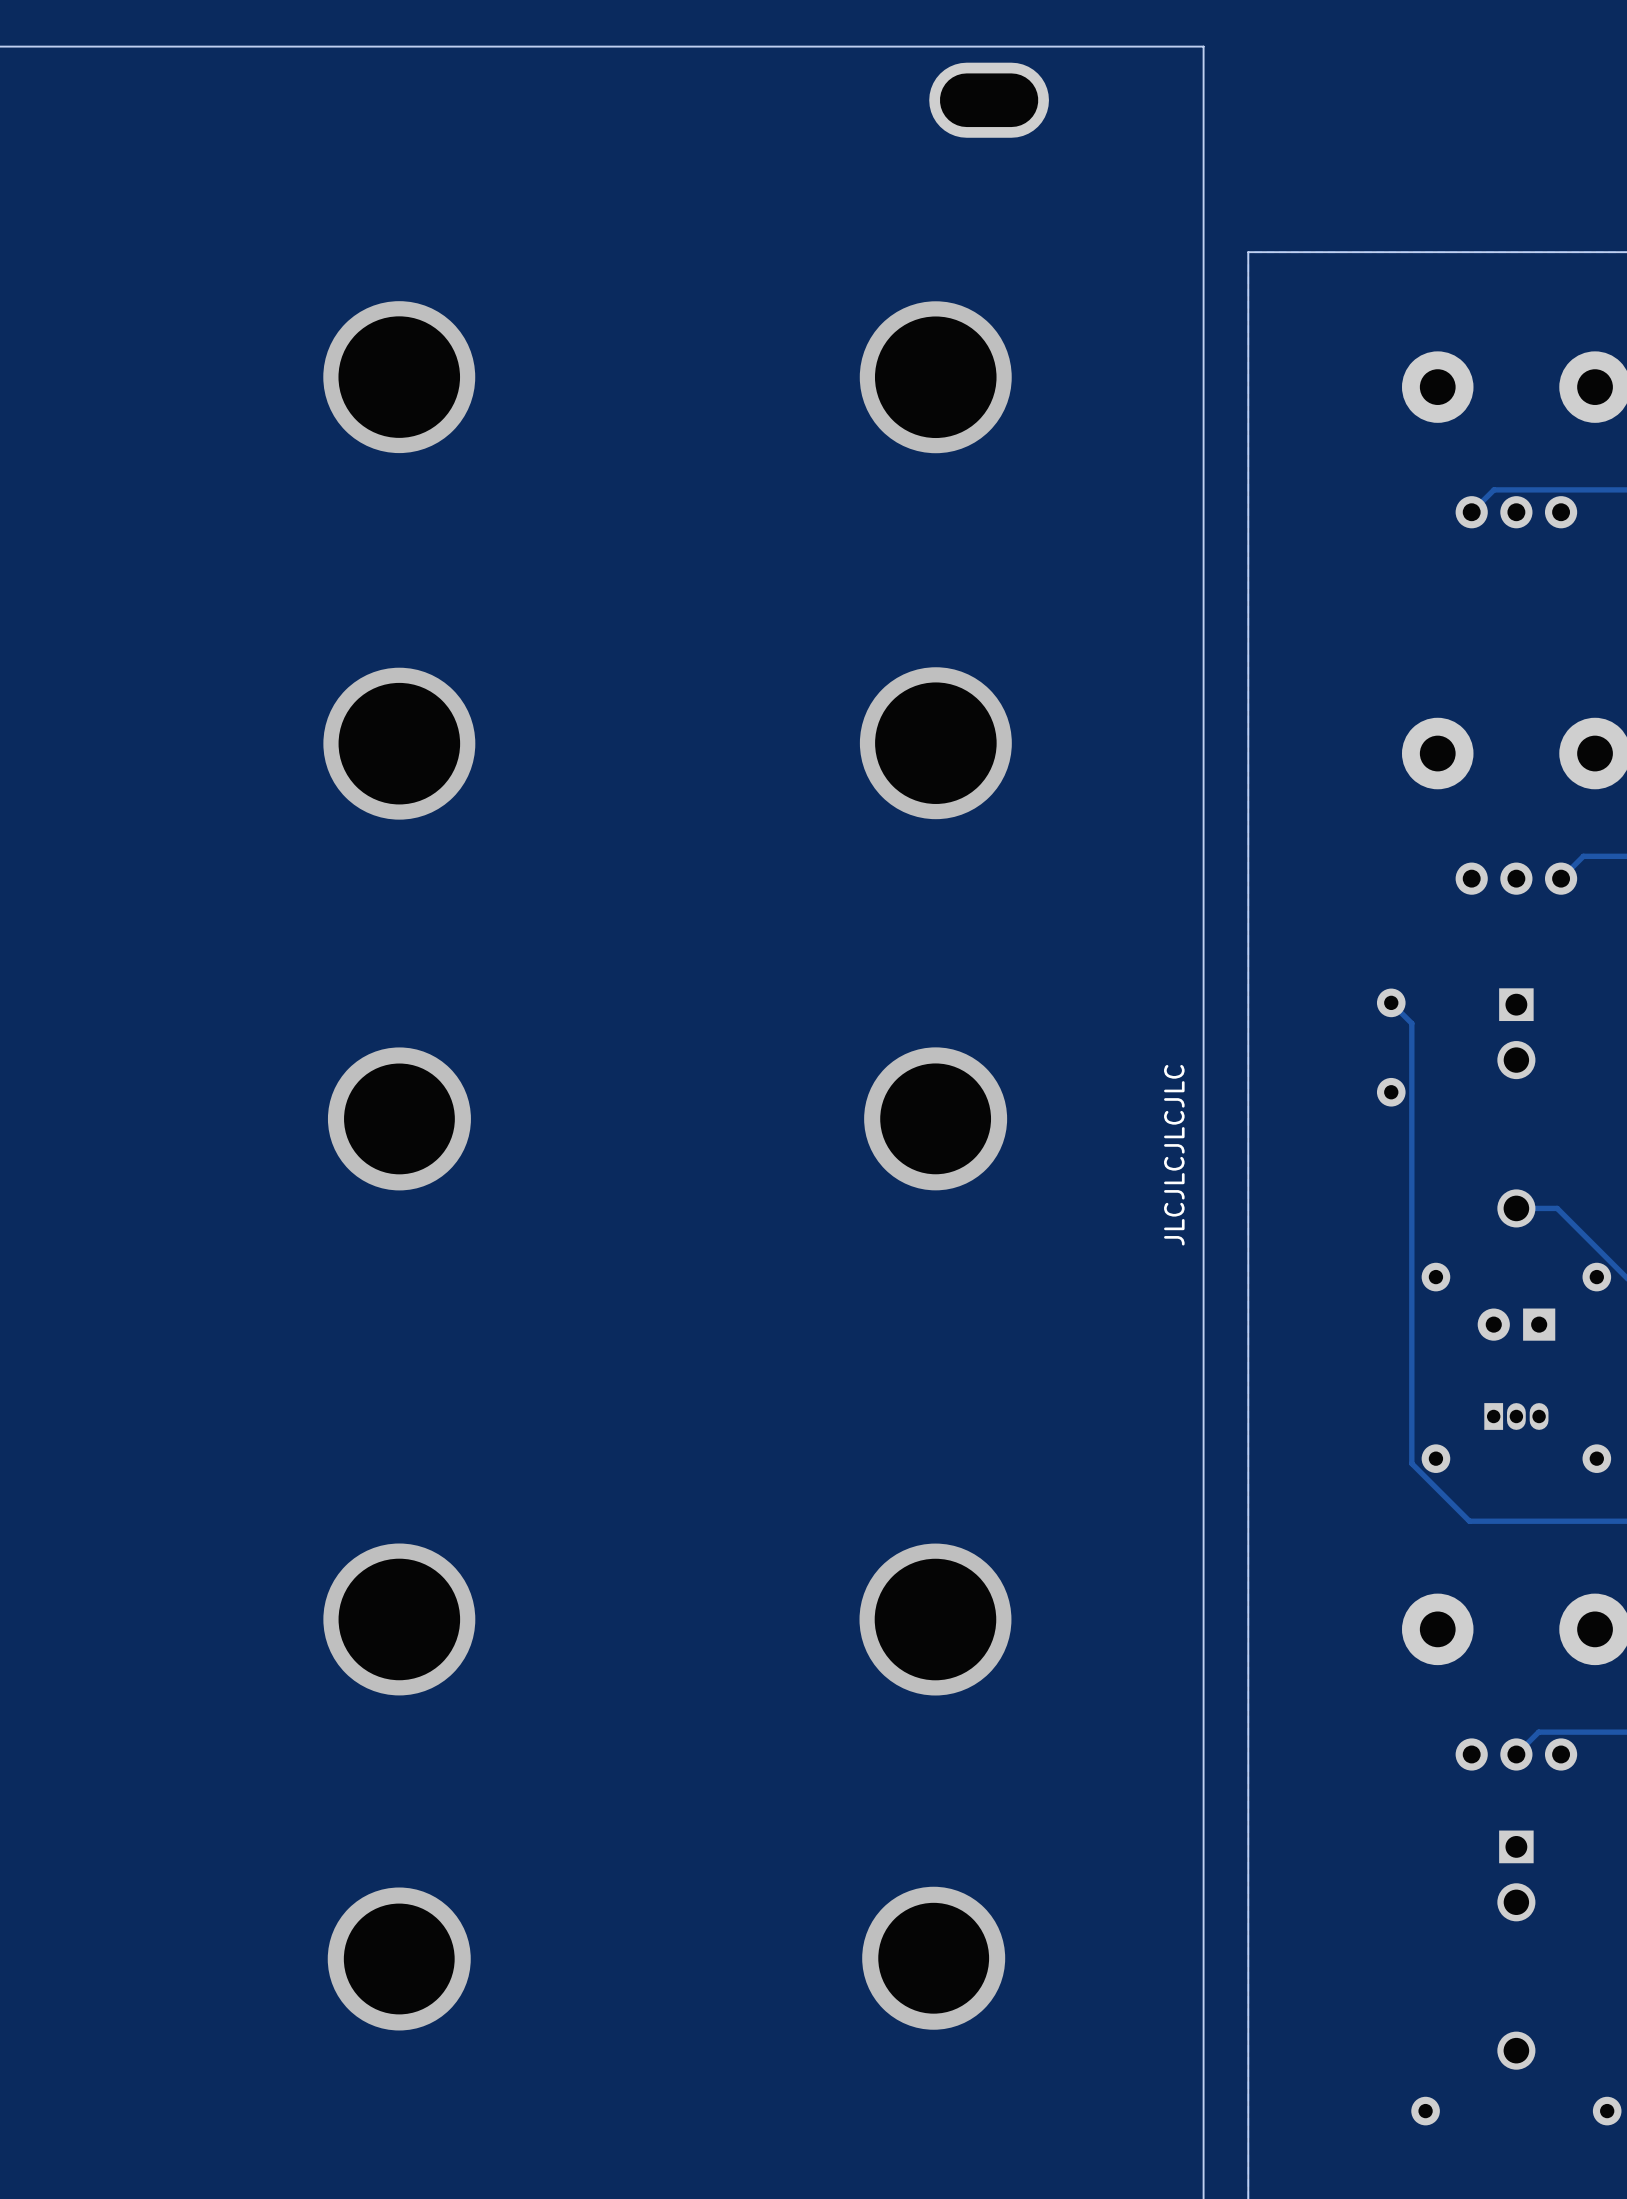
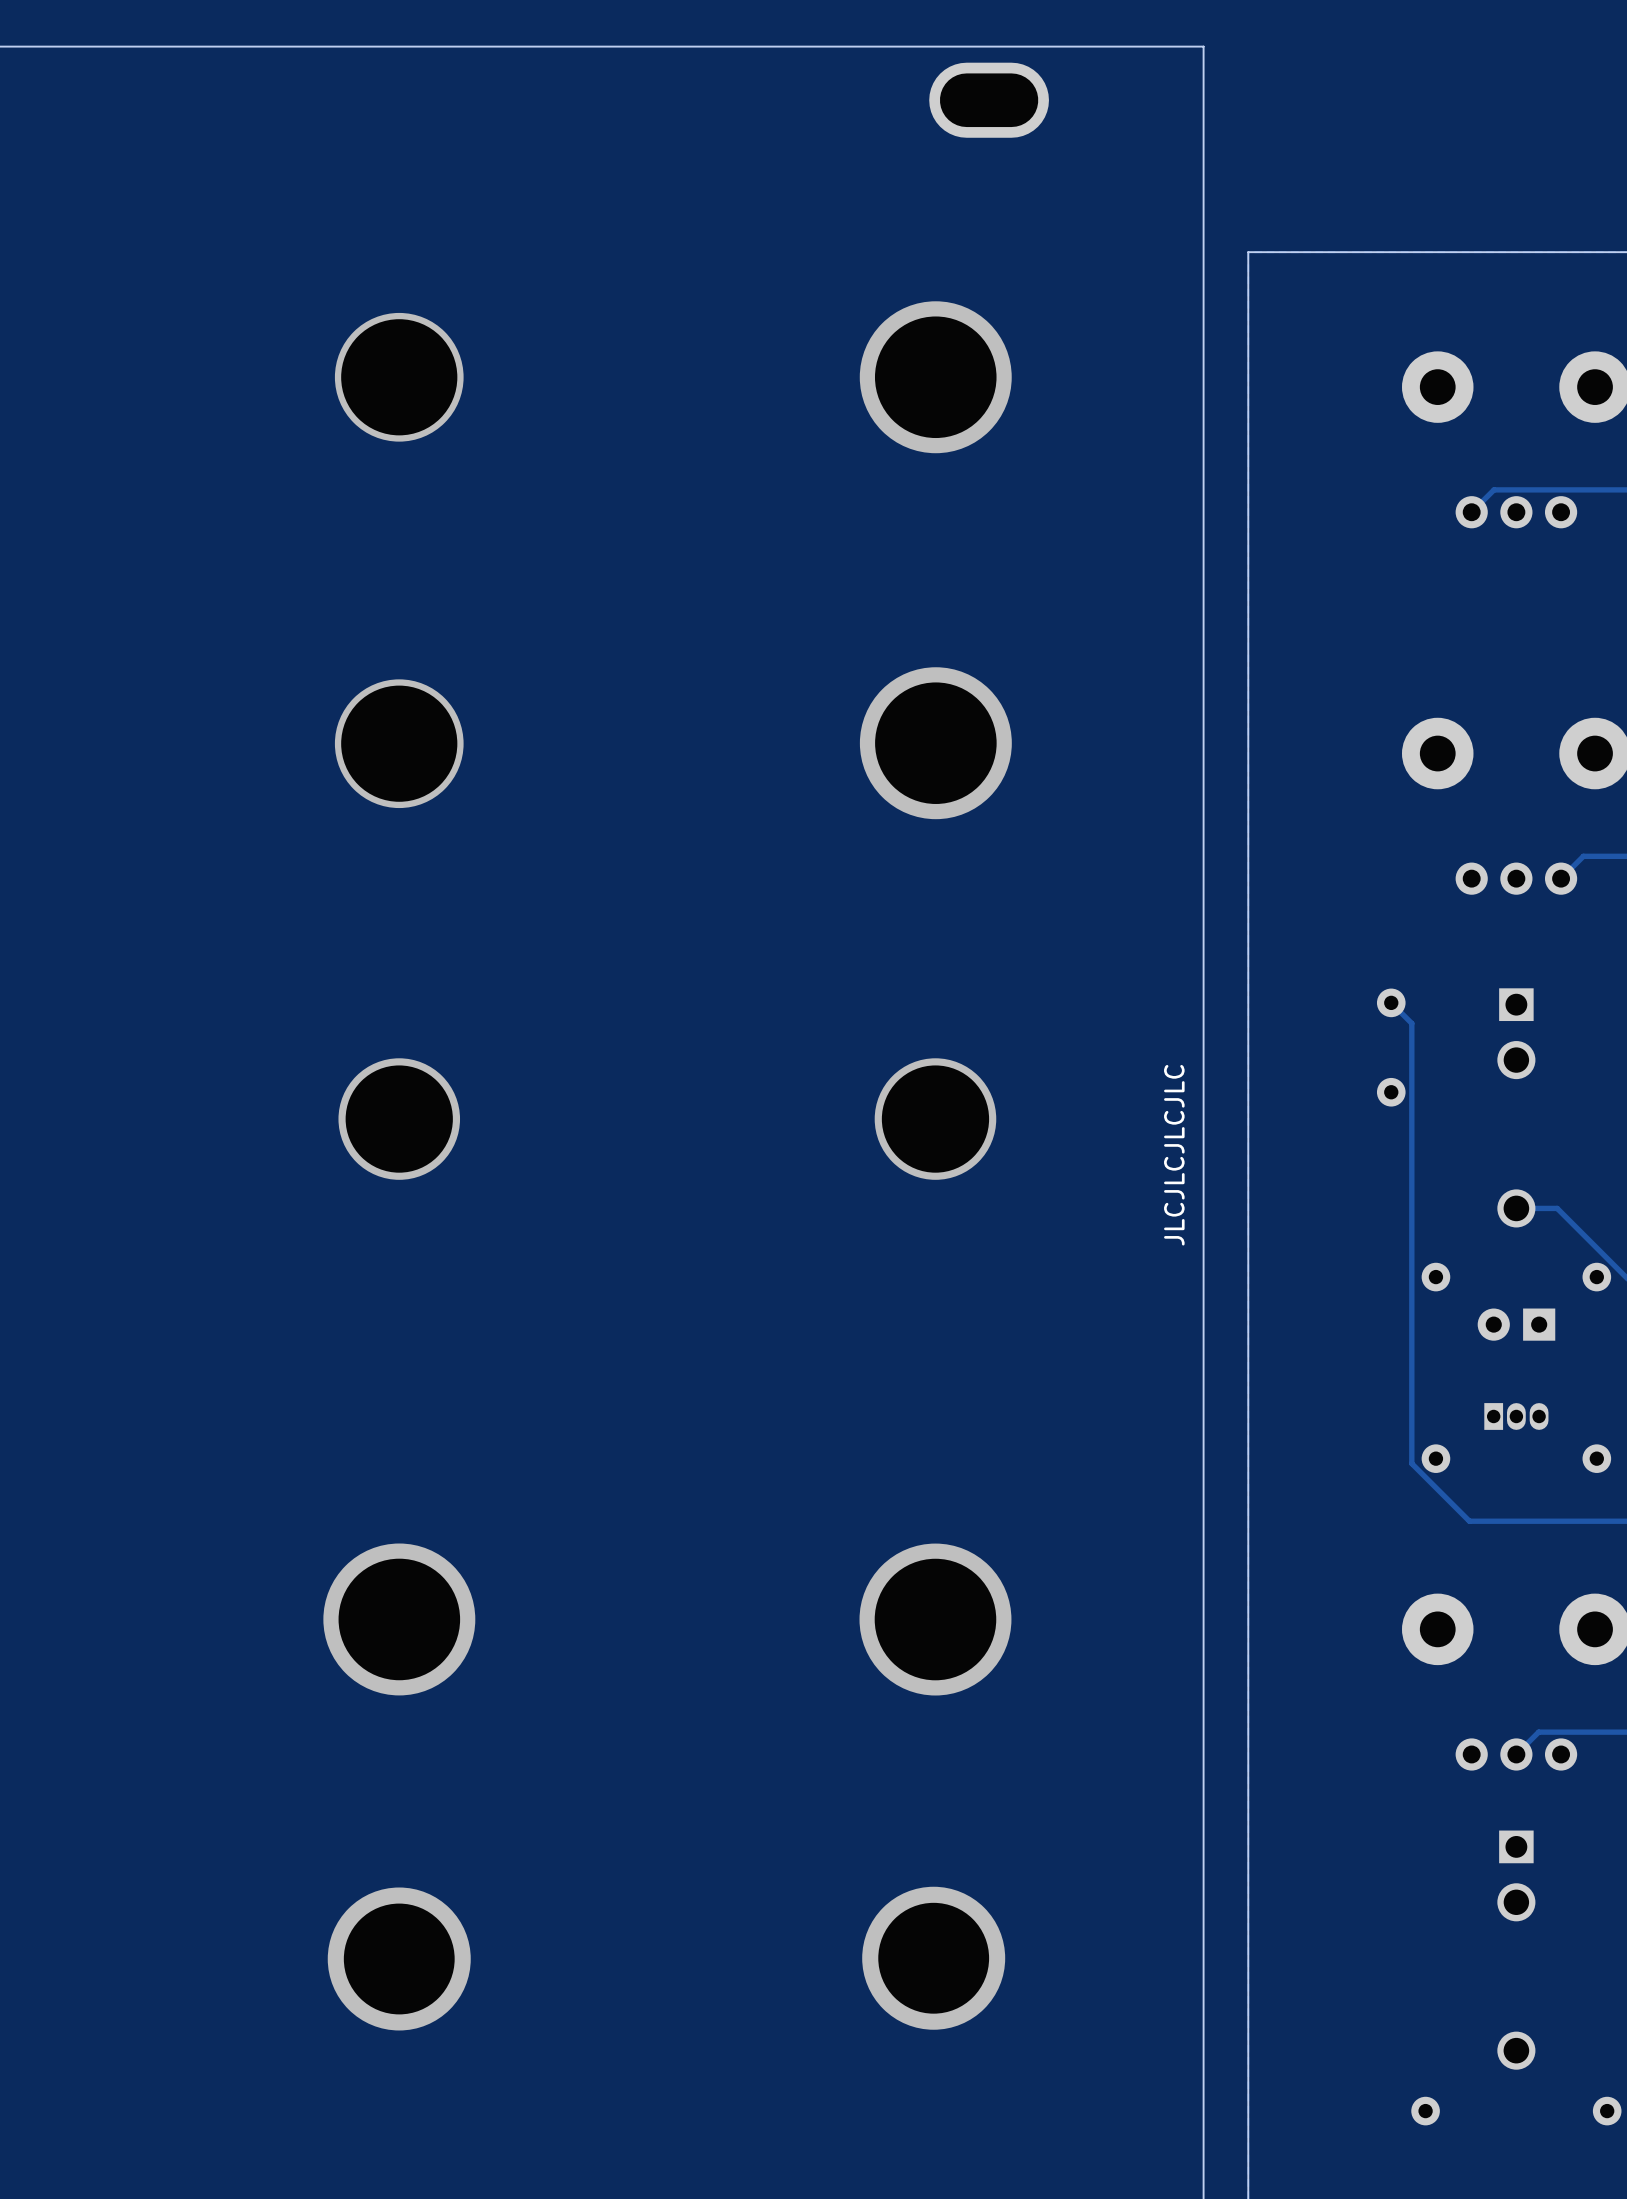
via size: [323, 301, 476, 454] -> [334, 312, 464, 442]
via size: [323, 667, 476, 820] -> [334, 679, 464, 809]
via size: [327, 1047, 471, 1191] -> [338, 1058, 461, 1180]
via size: [864, 1047, 1008, 1191] -> [874, 1058, 997, 1180]

